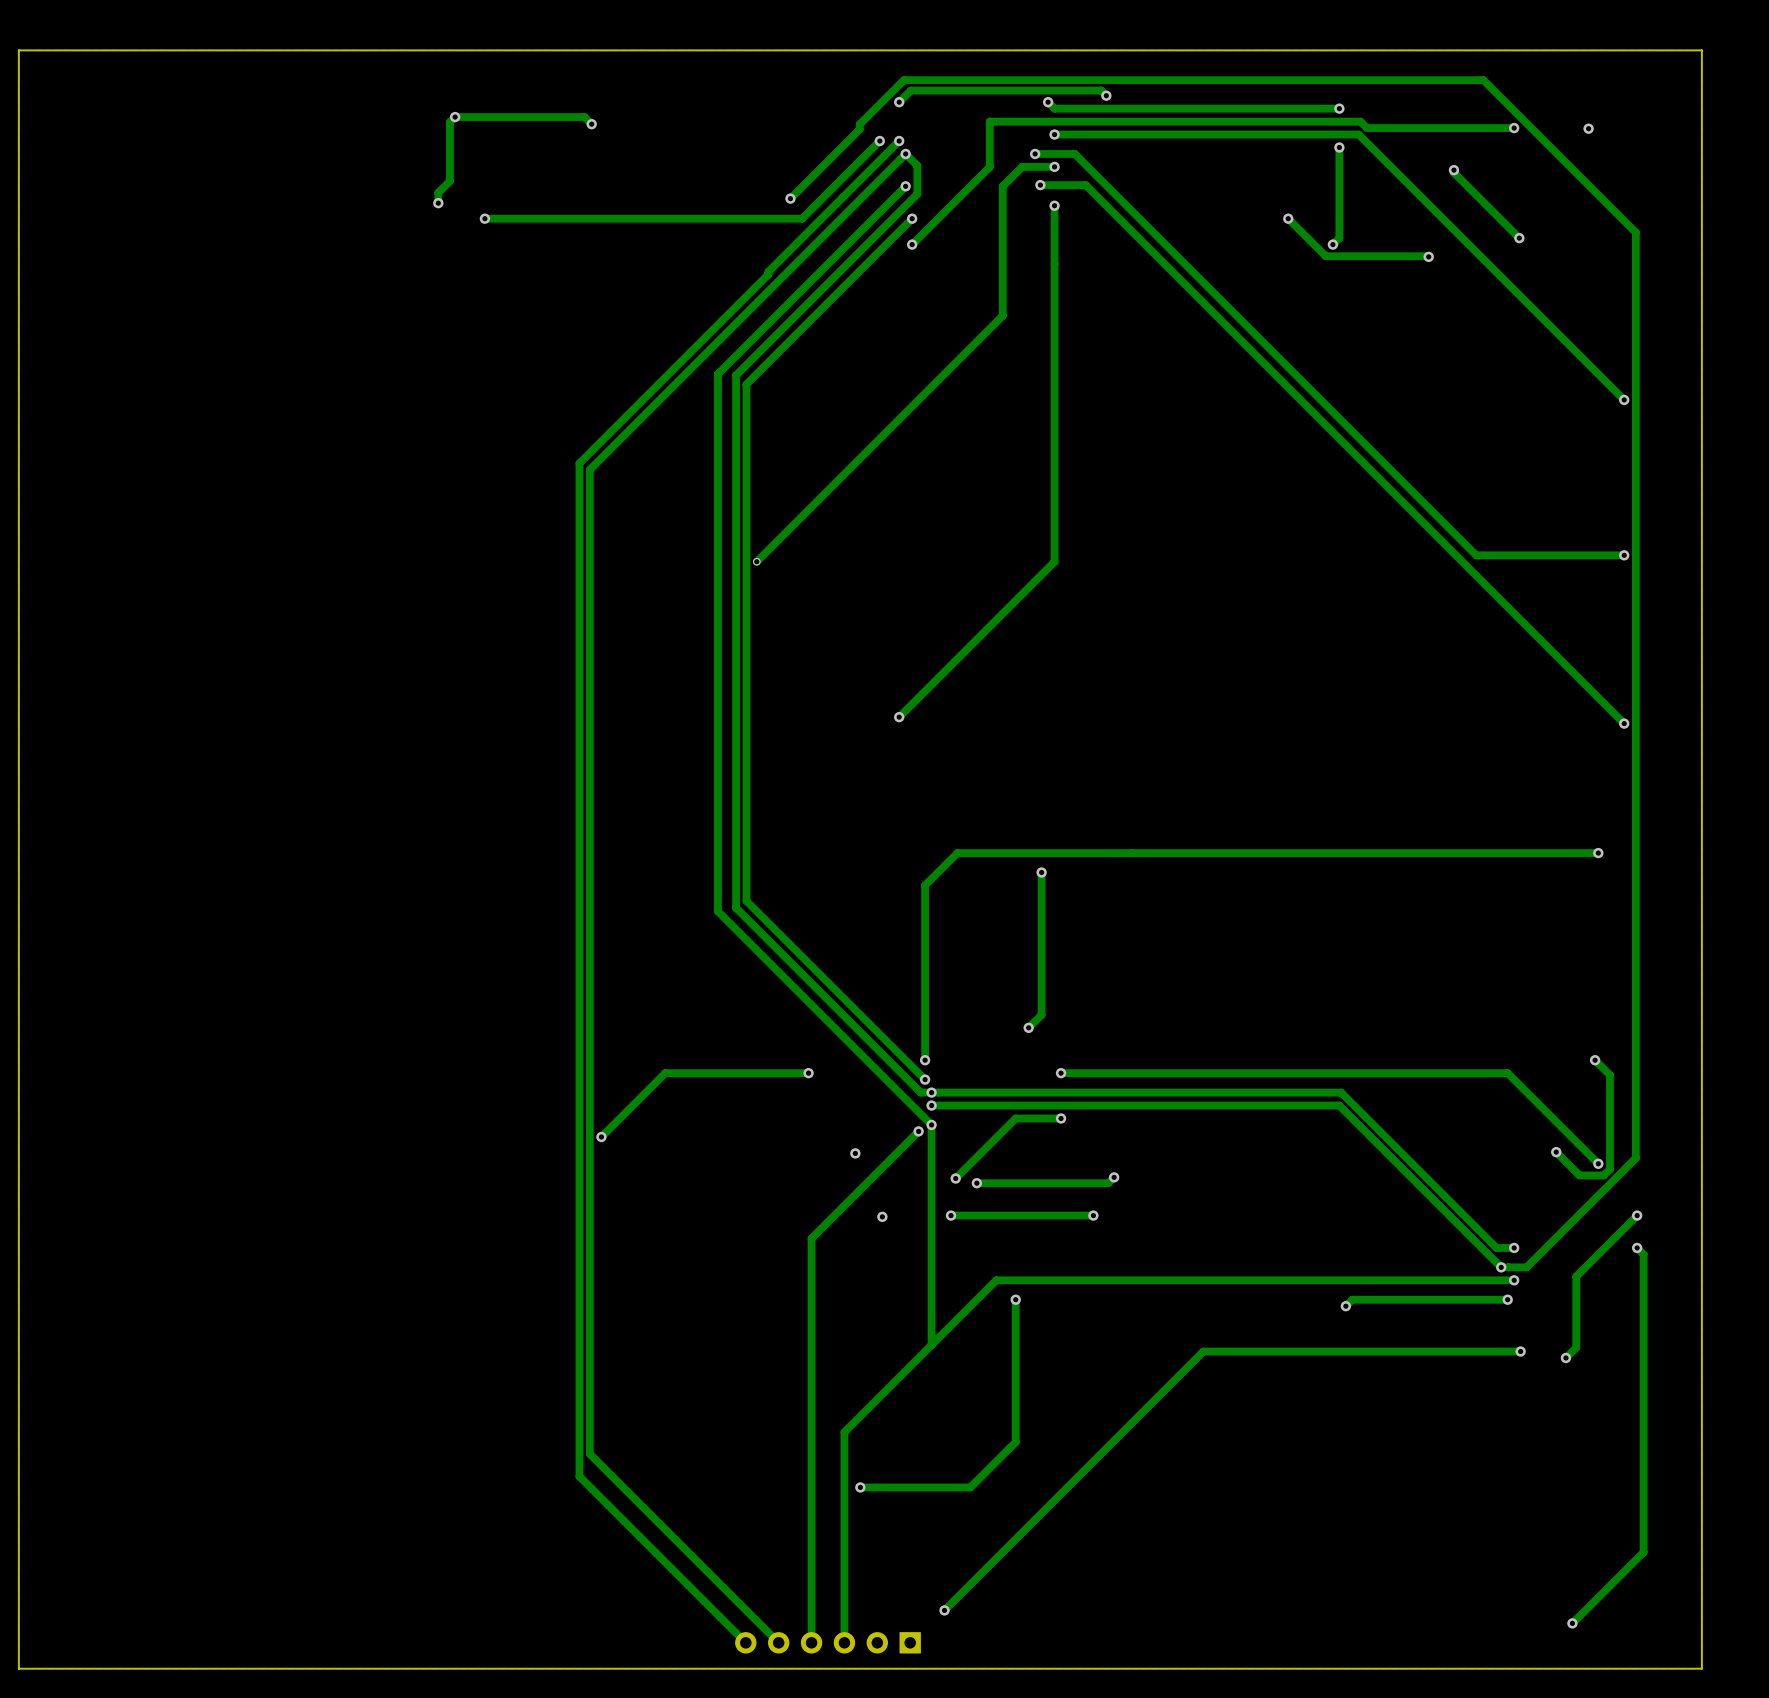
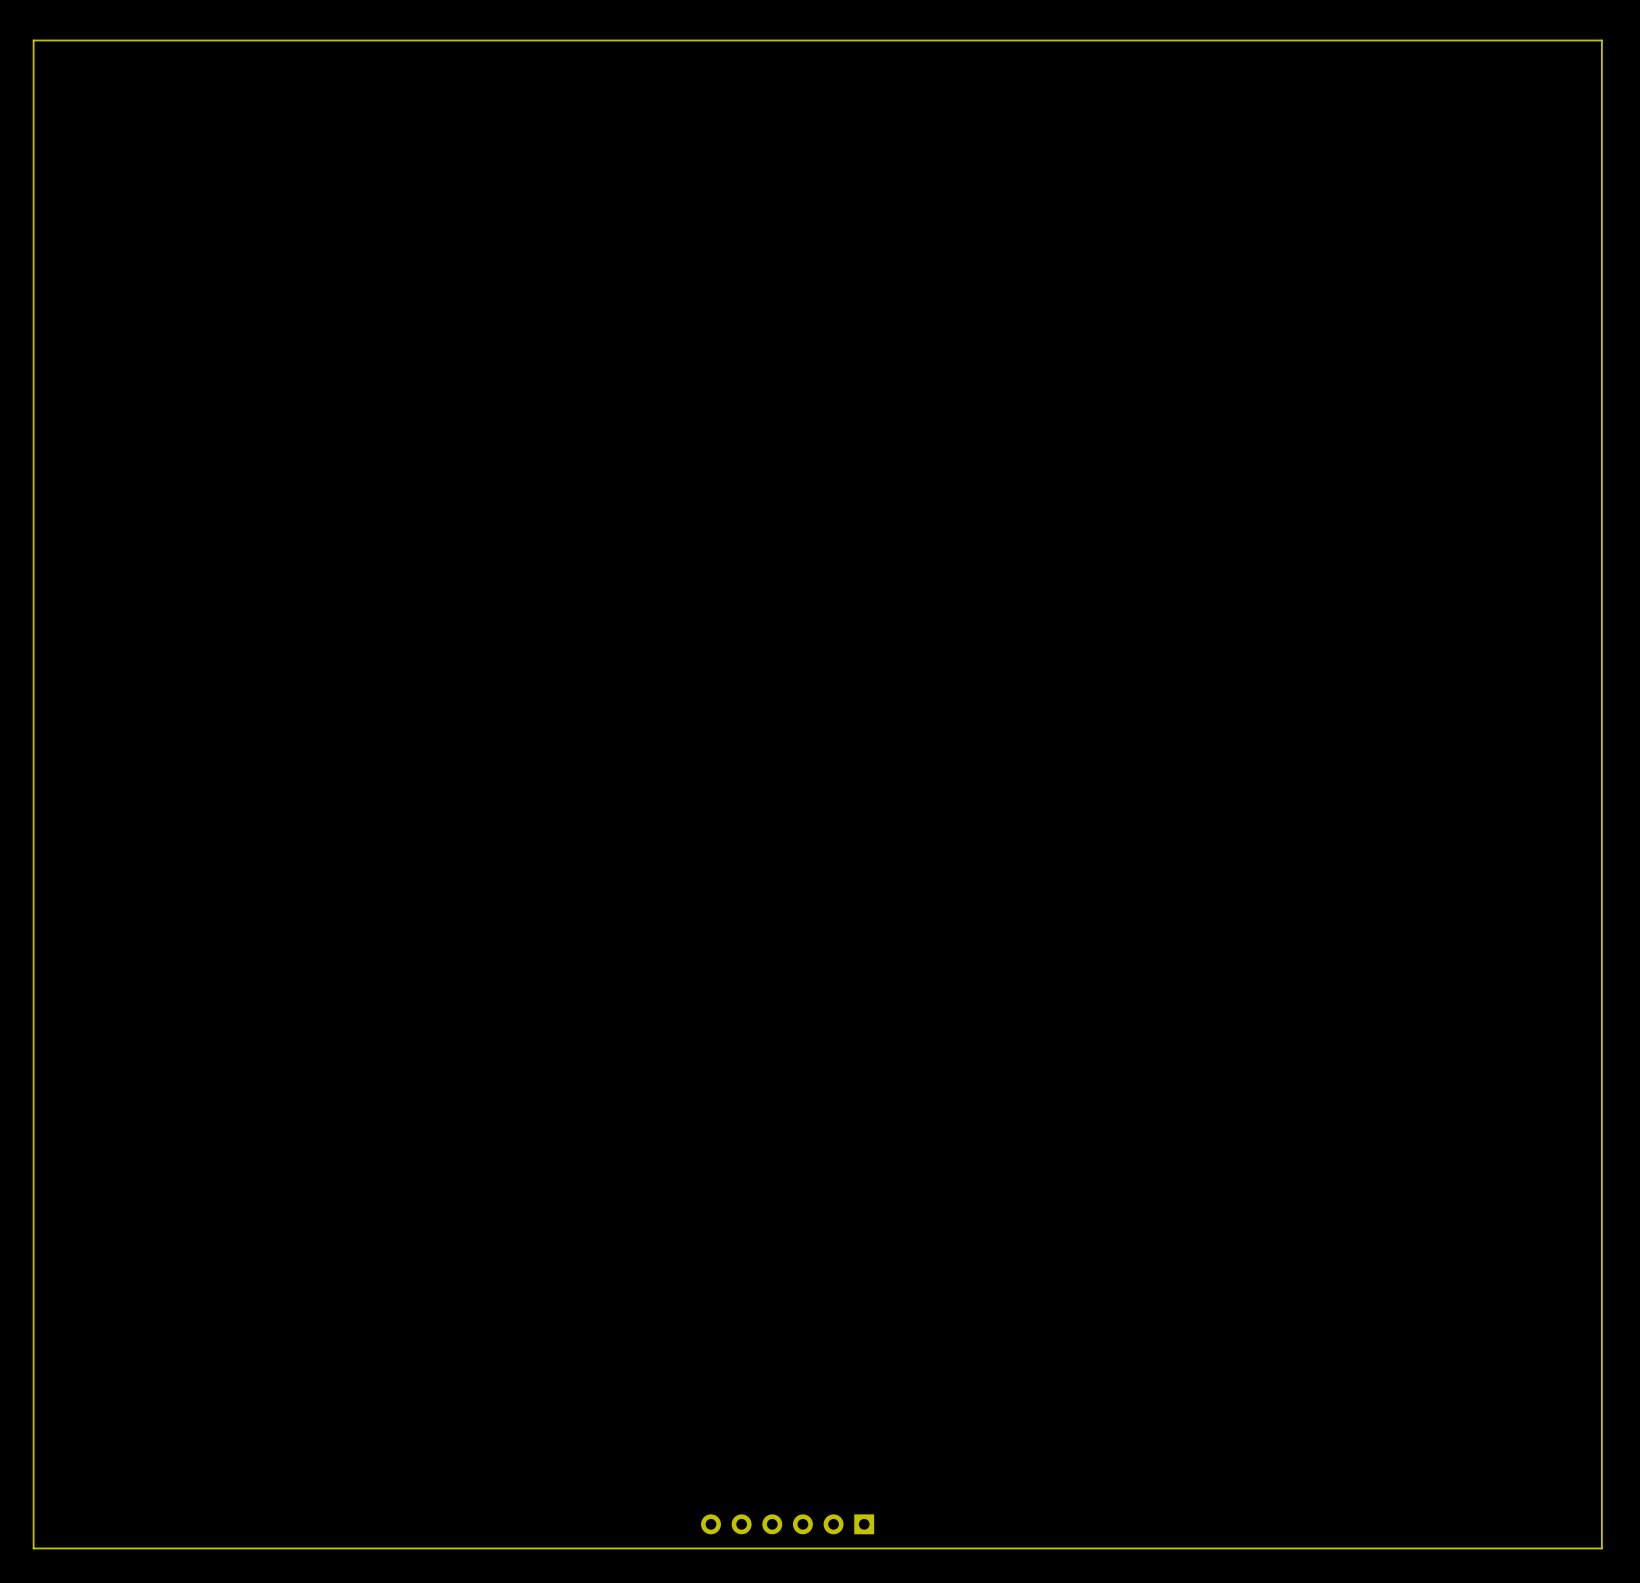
track: (1106, 95) (1101, 90) (910, 90) (899, 102) -> none
via: (1106, 95) -> none
via: (899, 102) -> none
track: (1048, 102) (1054, 108) (1339, 108) -> none
via: (1048, 102) -> none
via: (1339, 108) -> none
via: (455, 117) -> none
track: (591, 124) (584, 117) (455, 117) (449, 122) (449, 181) (438, 192) (438, 203) -> none
via: (591, 124) -> none
track: (1514, 128) (1366, 128) (1360, 121) (989, 121) (989, 166) (912, 244) -> none
via: (1514, 128) -> none
via: (1588, 128) -> none
track: (1054, 134) (1358, 134) (1624, 399) -> none
via: (1054, 134) -> none
track: (879, 141) (802, 218) (484, 218) -> none
via: (879, 141) -> none
track: (899, 141) (579, 463) (579, 1476) (745, 1642) -> none
via: (899, 141) -> none
track: (1339, 147) (1339, 238) (1332, 244) -> none
via: (1339, 147) -> none
via: (905, 153) -> none
track: (1035, 153) (1074, 153) (1476, 555) (1624, 555) -> none
via: (1035, 153) -> none
track: (1054, 166) (1022, 166) (1002, 186) (1002, 315) (756, 561) -> none
via: (1054, 166) -> none
track: (1453, 170) (1453, 172) (1519, 238) -> none
via: (1453, 170) -> none
track: (1040, 185) (1085, 185) (1624, 723) -> none
via: (1040, 185) -> none
track: (905, 186) (717, 374) (717, 911) (931, 1124) (931, 1345) -> none
via: (905, 186) -> none
track: (790, 198) (859, 129) (859, 124) (903, 80) (1483, 80) (1635, 232) (1635, 1158) (1526, 1267) (1501, 1267) (1339, 1105) (931, 1105) -> none
via: (790, 198) -> none
via: (438, 203) -> none
track: (1054, 205) (1054, 561) (899, 717) -> none
via: (1054, 205) -> none
via: (484, 218) -> none
track: (912, 218) (746, 384) (746, 900) (925, 1079) -> none
via: (912, 218) -> none
track: (1288, 218) (1325, 256) (1428, 256) -> none
via: (1288, 218) -> none
via: (1519, 238) -> none
via: (912, 244) -> none
via: (1332, 244) -> none
via: (1428, 256) -> none
via: (1624, 399) -> none
via: (1624, 555) -> none
via: (756, 561) -> none
via: (899, 717) -> none
via: (1624, 723) -> none
track: (1598, 853) (957, 853) (925, 885) (925, 1060) -> none
via: (1598, 853) -> none
track: (1041, 872) (1041, 1014) (1028, 1027) -> none
via: (1041, 872) -> none
via: (1028, 1027) -> none
via: (925, 1060) -> none
track: (1595, 1060) (1609, 1075) (1609, 1169) (1603, 1175) (1579, 1175) (1556, 1152) -> none
via: (1595, 1060) -> none
track: (808, 1073) (665, 1073) (601, 1137) -> none
via: (808, 1073) -> none
track: (1061, 1073) (1507, 1073) (1598, 1163) -> none
via: (1061, 1073) -> none
via: (925, 1079) -> none
via: (931, 1092) -> none
via: (931, 1105) -> none
track: (1061, 1118) (1015, 1118) (955, 1178) -> none
via: (1061, 1118) -> none
via: (931, 1124) -> none
track: (918, 1131) (811, 1238) (811, 1642) -> none
via: (918, 1131) -> none
via: (601, 1137) -> none
via: (1556, 1152) -> none
via: (855, 1153) -> none
via: (1598, 1163) -> none
track: (1114, 1177) (1108, 1183) (976, 1183) -> none
via: (1114, 1177) -> none
via: (955, 1178) -> none
via: (976, 1183) -> none
via: (950, 1215) -> none
track: (1093, 1215) (950, 1215) -> none
via: (1093, 1215) -> none
track: (1637, 1215) (1576, 1276) (1576, 1347) (1565, 1357) -> none
via: (1637, 1215) -> none
via: (882, 1216) -> none
track: (1514, 1247) (1496, 1247) (1341, 1092) (920, 1092) (736, 907) (736, 375) (917, 194) (917, 165) (905, 153) (589, 469) (589, 1453) (778, 1642) -> none
via: (1514, 1247) -> none
track: (1637, 1247) (1643, 1254) (1643, 1552) (1572, 1623) -> none
via: (1637, 1247) -> none
via: (1501, 1267) -> none
track: (1514, 1280) (996, 1280) (844, 1432) (844, 1642) -> none
via: (1514, 1280) -> none
track: (1015, 1299) (1015, 1442) (970, 1487) (860, 1487) -> none
via: (1015, 1299) -> none
track: (1507, 1299) (1352, 1299) (1345, 1306) -> none
via: (1507, 1299) -> none
via: (1345, 1306) -> none
track: (1520, 1351) (1203, 1351) (944, 1610) -> none
via: (1520, 1351) -> none
via: (1565, 1357) -> none
via: (860, 1487) -> none
via: (944, 1610) -> none
via: (1572, 1623) -> none

